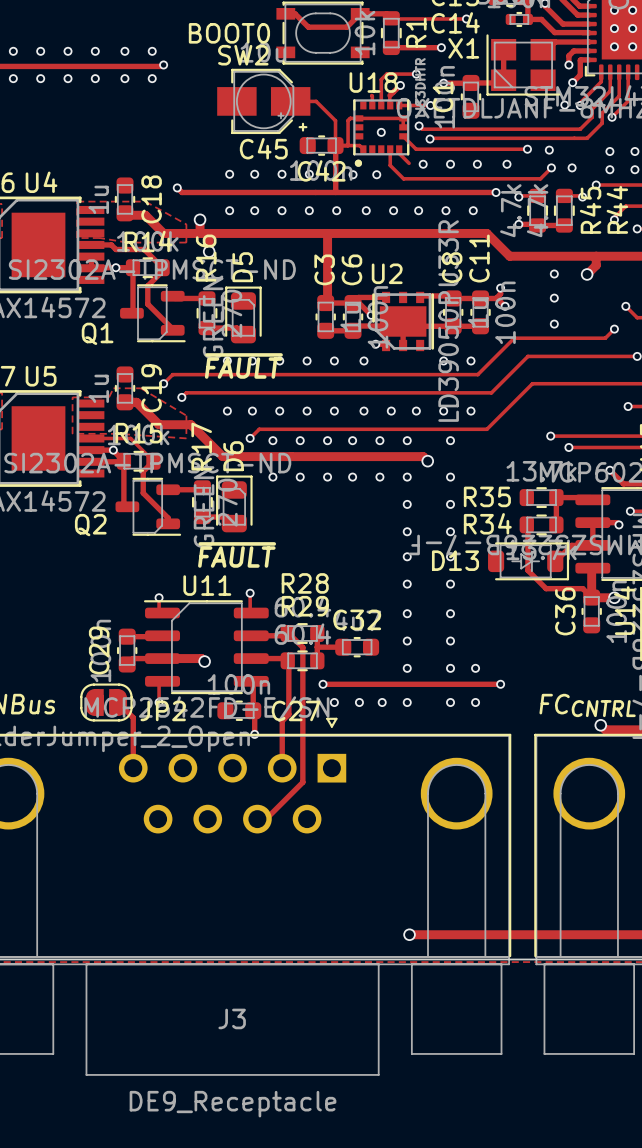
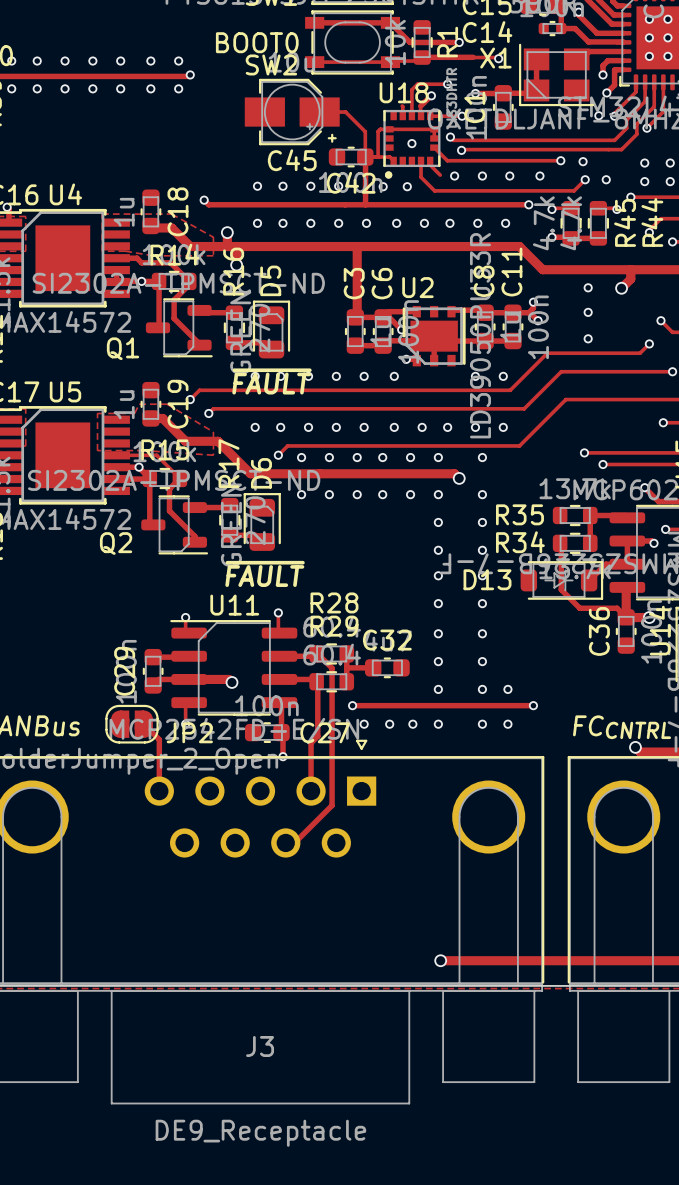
track: (295, 13) (308, 27) (346, 27) (360, 13) (386, 13) (391, 18) -> (324, 22) (390, 22) (410, 42) (459, 42)
track: (391, 18) (466, 18) -> none
via: (466, 18) -> none
via: none -> (459, 42)
via: (441, 47) -> none
track: none -> (498, 58) (422, 57) (418, 61) (314, 62)
via: none -> (498, 58)

